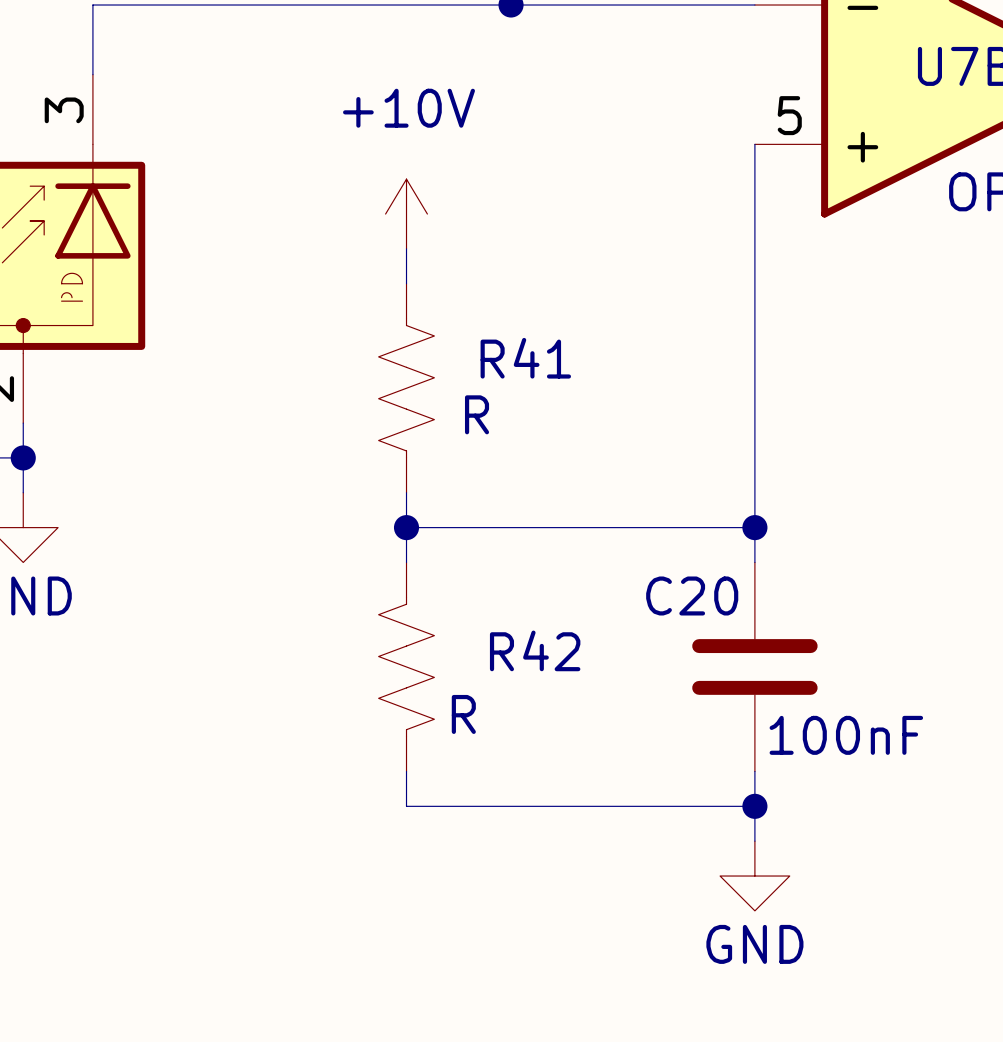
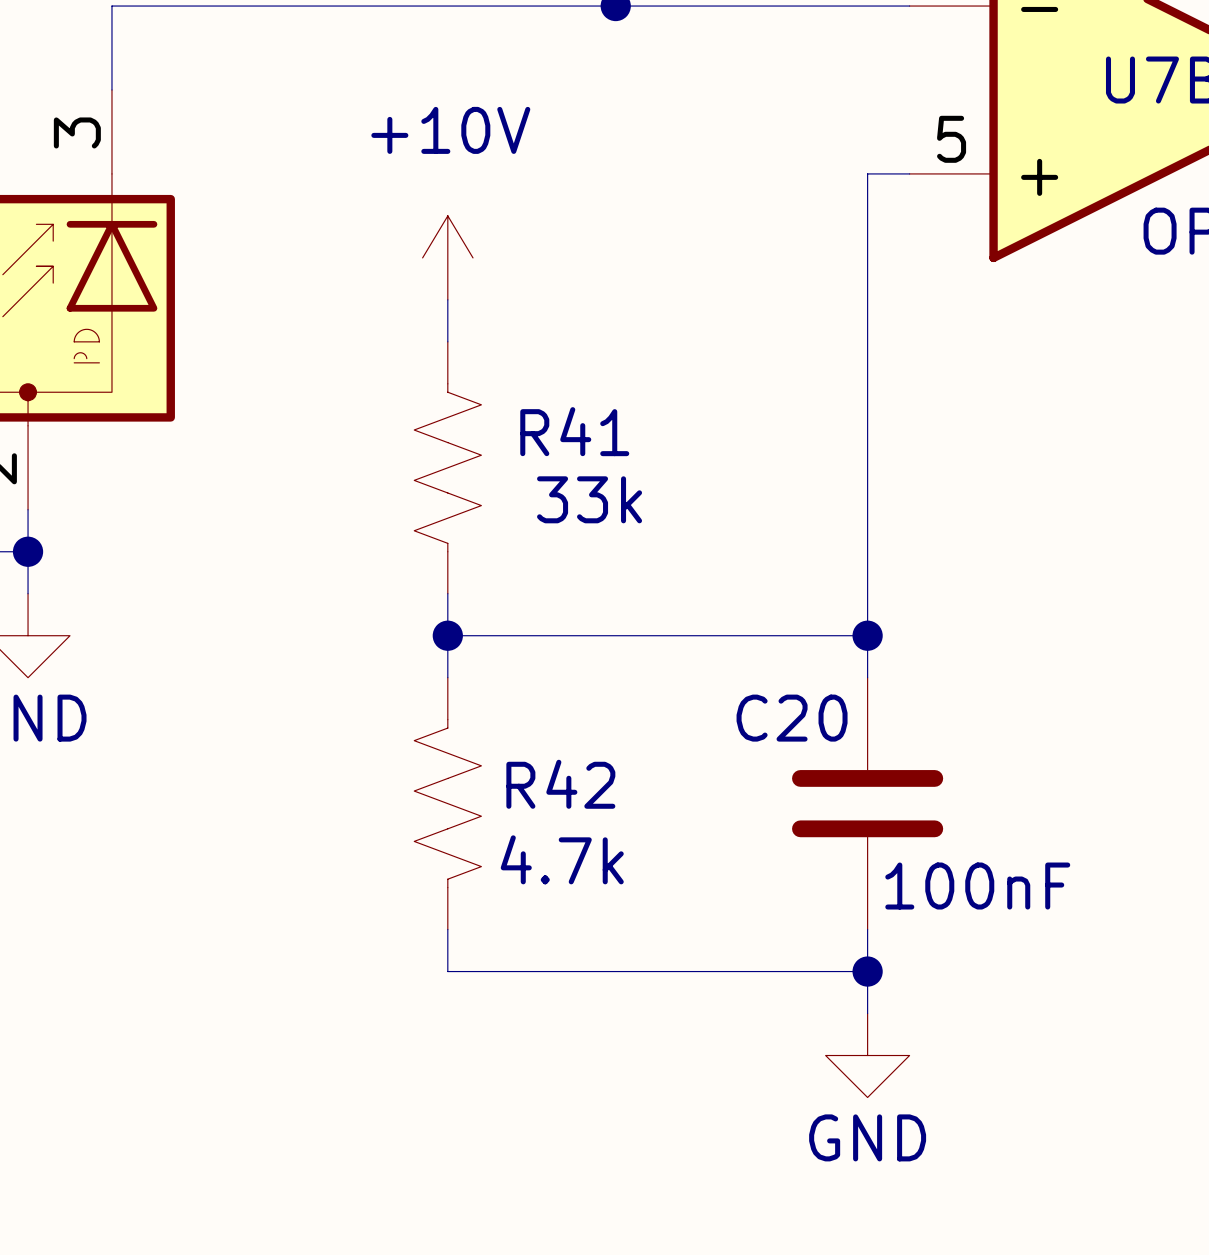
wire: (754, 144) (754, 562) -> (909, 173) (867, 173) (867, 677)
power symbol position: +10V (406, 214) -> +10V (447, 257)
wire: (406, 248) (406, 283) -> (447, 299) (447, 341)
R41 name position: R41 (525, 358) -> R41 (574, 431)
R41 position: (406, 388) -> (447, 467)
R41 value: R (477, 414) -> 33k (589, 499)
wire: (406, 492) (406, 562) -> (447, 593) (447, 677)
junction position: (406, 527) -> (447, 635)
wire: (720, 527) (754, 527) -> (447, 635) (489, 635)
junction position: (754, 527) -> (867, 635)
R42 name position: R42 (535, 650) -> R42 (560, 784)
R42 position: (406, 666) -> (447, 803)
C20 position: (754, 666) -> (867, 803)
R42 value: R (463, 714) -> 4.7k (562, 859)
wire: (406, 771) (406, 806) -> (447, 929) (447, 971) (489, 971)
wire: (754, 771) (754, 841) -> (867, 929) (867, 1013)
wire: (720, 806) (754, 806) -> none
junction position: (754, 806) -> (867, 971)
power symbol position: GND (754, 876) -> GND (867, 1055)

